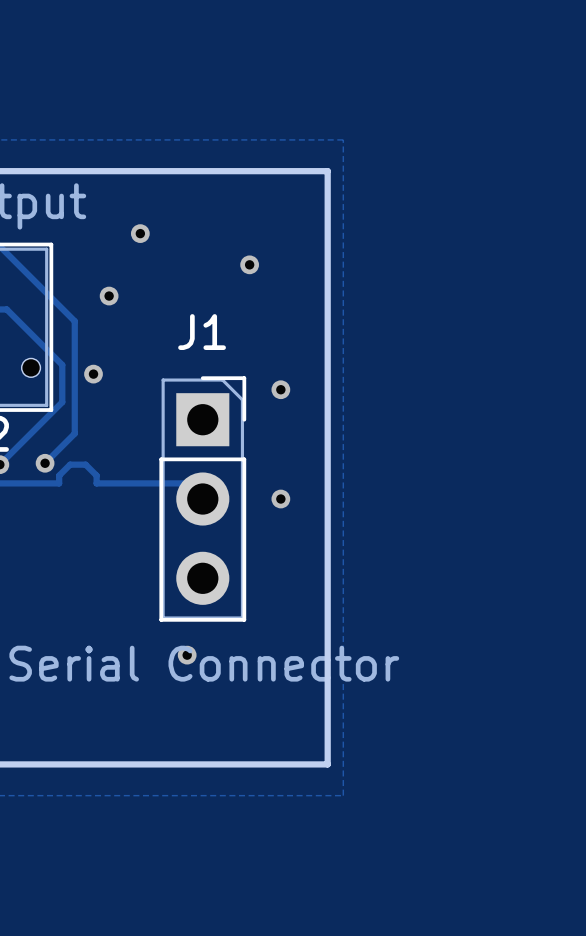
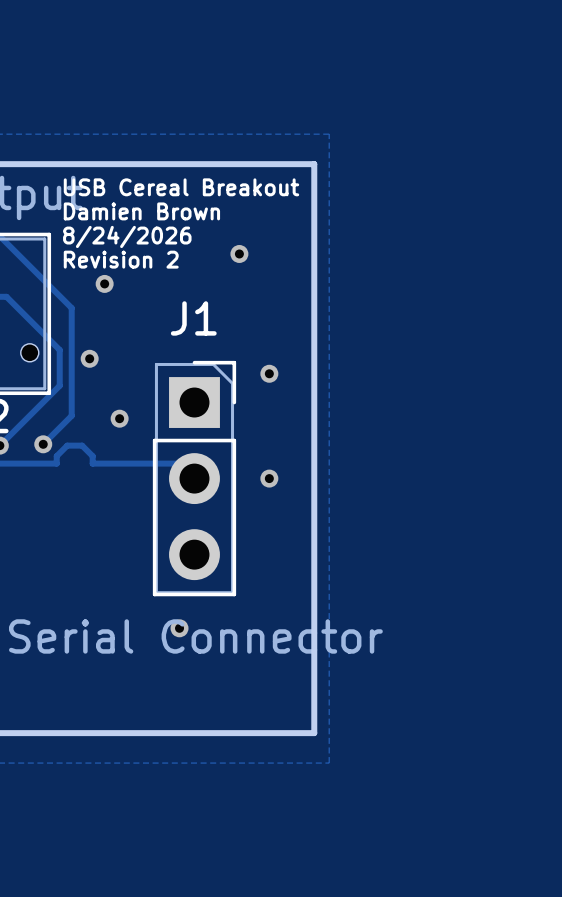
text: none -> USB Cereal Breakout (181, 187)
text: none -> Damien Brown (141, 211)
via: (140, 233) -> none
text: none -> 8/24/2026 (127, 236)
text: none -> Revision 2 (121, 259)
via: none -> (119, 418)

